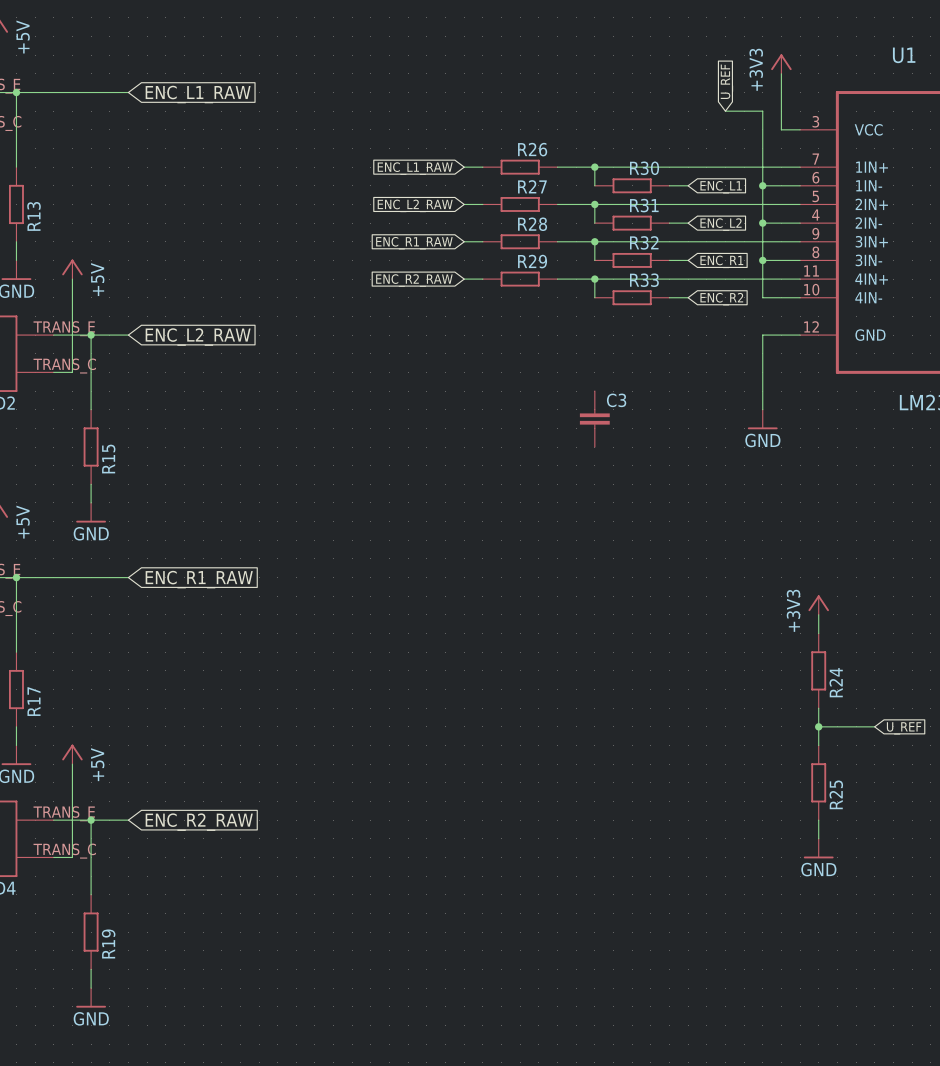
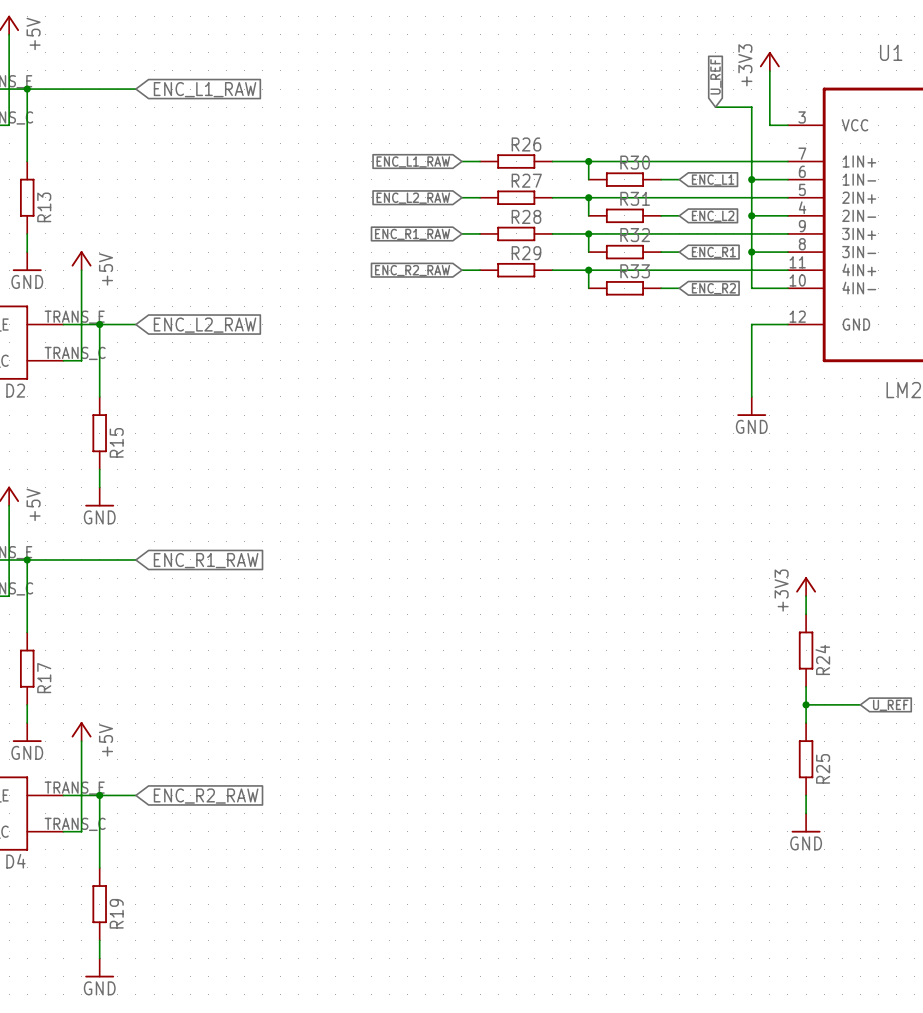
C3: (594, 419) -> none

